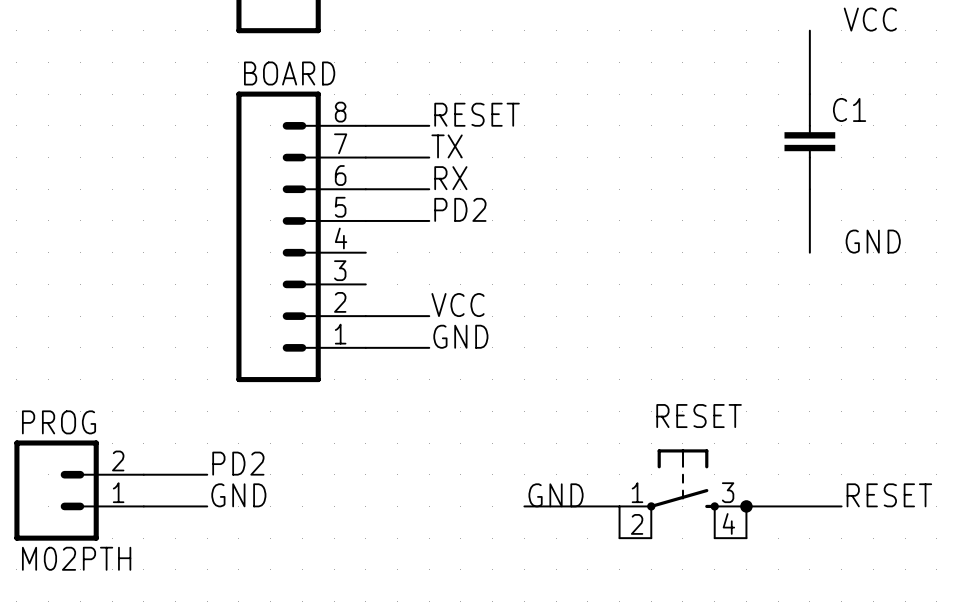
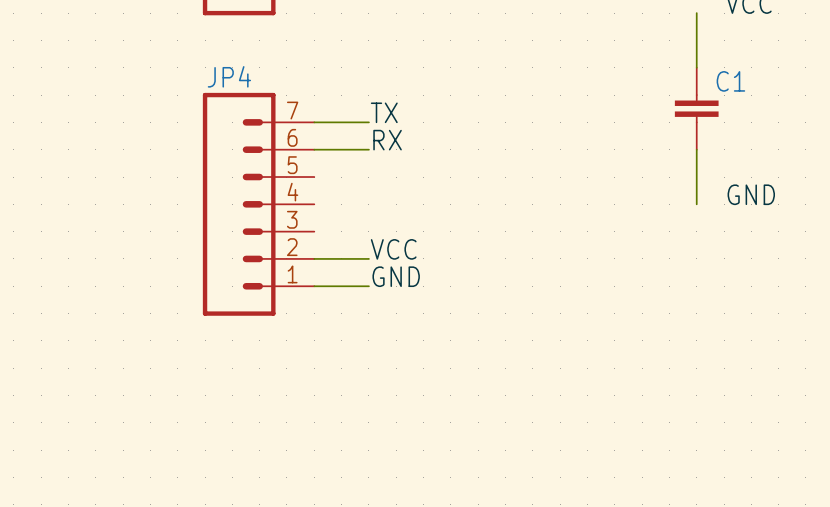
label: RESET (477, 114) -> none
wire: (365, 125) (429, 125) -> none
label: PD2 (460, 209) -> none
wire: (365, 220) (429, 220) -> none
BOARD: (301, 236) -> none
JP4: none -> (258, 204)
label: PD2 (238, 463) -> none
wire: (143, 474) (207, 474) -> none
PROG: M02PTH (79, 490) -> none
RESET: (682, 494) -> none
label: GND (238, 495) -> none
label: GND (556, 495) -> none
label: RESET (889, 495) -> none
wire: (143, 506) (207, 506) -> none
wire: (524, 506) (619, 506) (619, 538) -> none
junction: (746, 506) -> none
wire: (841, 506) (746, 506) (746, 538) -> none

